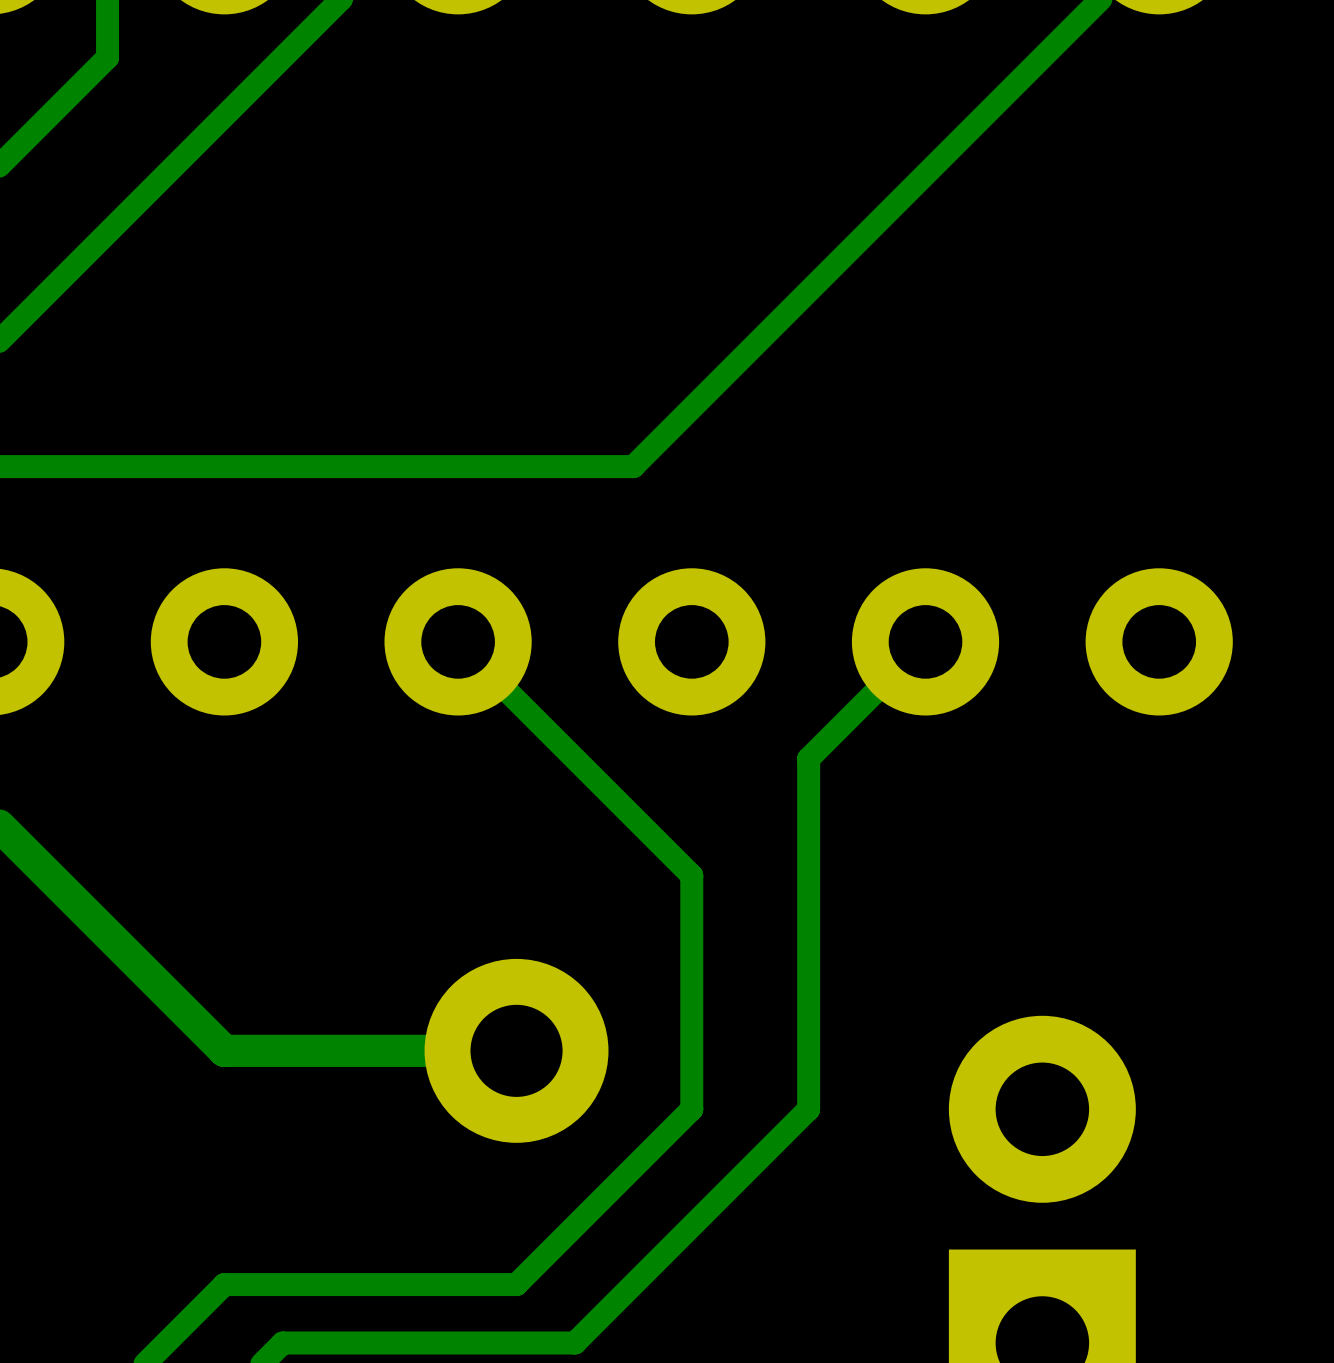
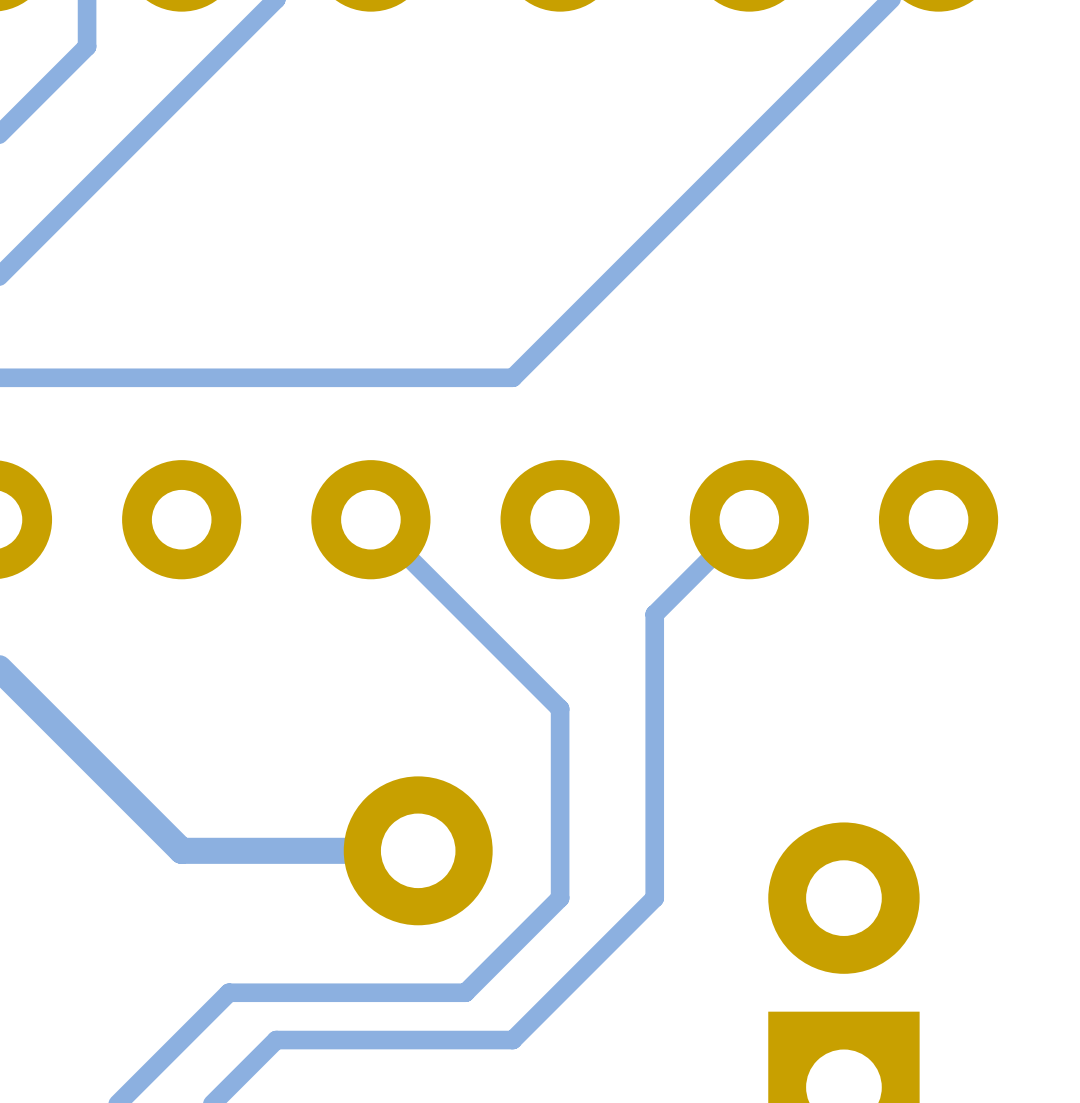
track: (574, 1226) (516, 1284) -> (512, 1040) (418, 1040)
track: none -> (465, 992) (228, 992) (181, 1040)
track: (341, 1284) (224, 1284) -> (276, 1040) (228, 1087)
track: (633, 1284) (574, 1343) (282, 1343) -> none

